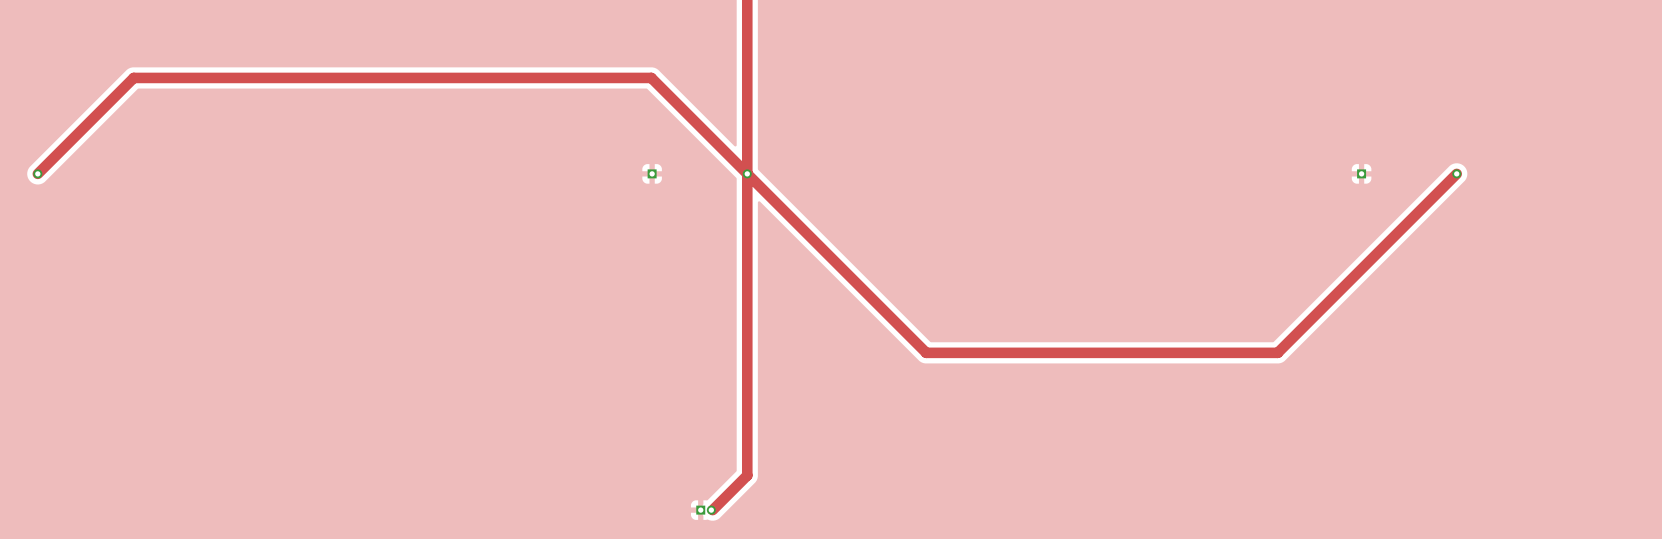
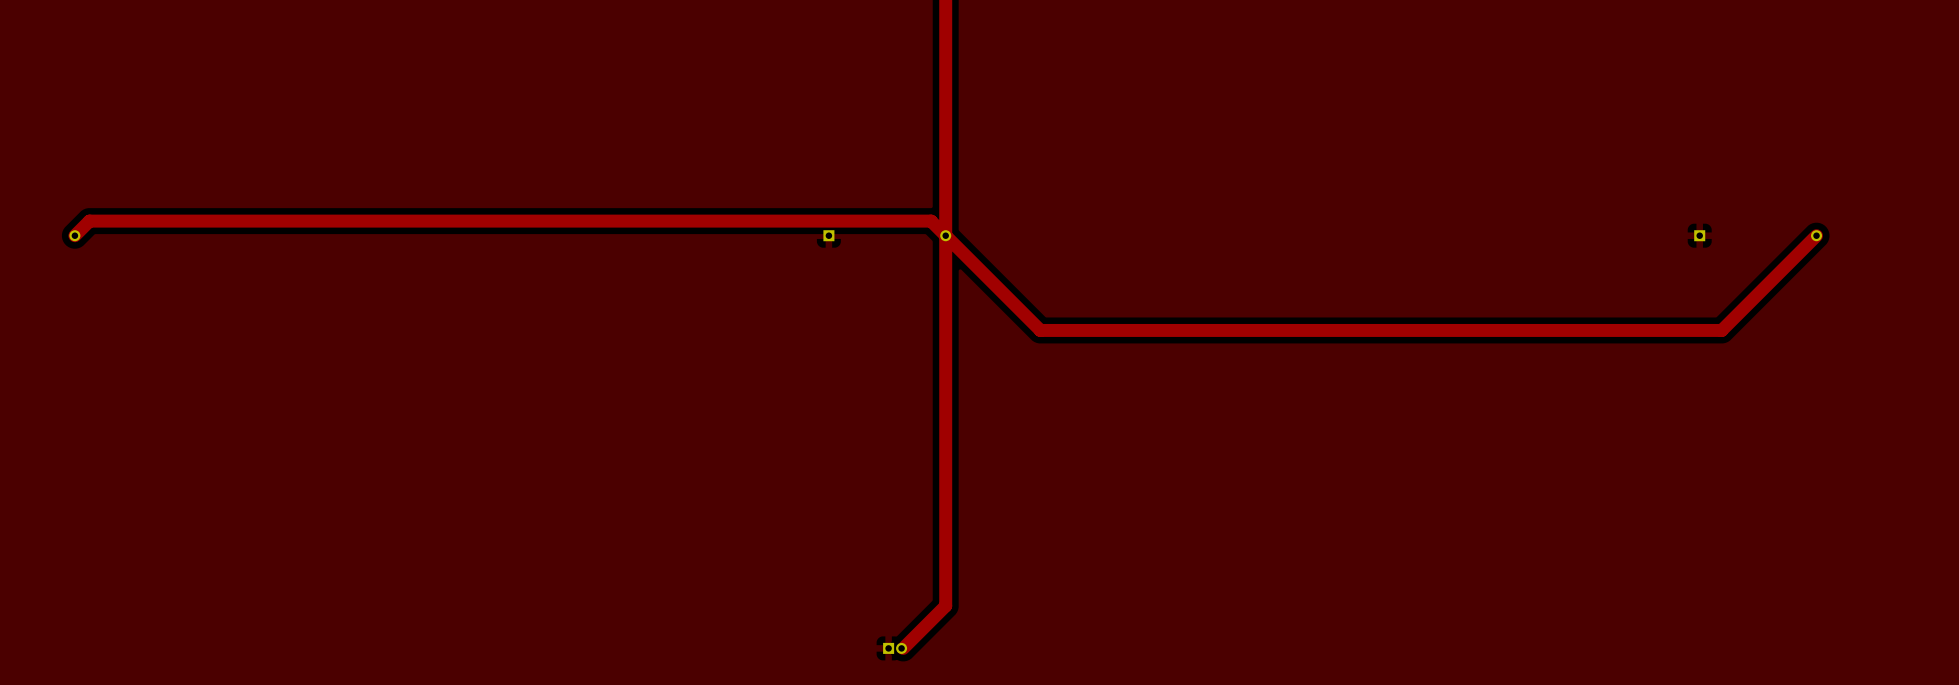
top track: (735, 161) (651, 77) (133, 77) (49, 161) -> (931, 221) (89, 221)
top track: (1379, 251) (1277, 352) (926, 352) (824, 251) -> (1721, 330) (1040, 330)

